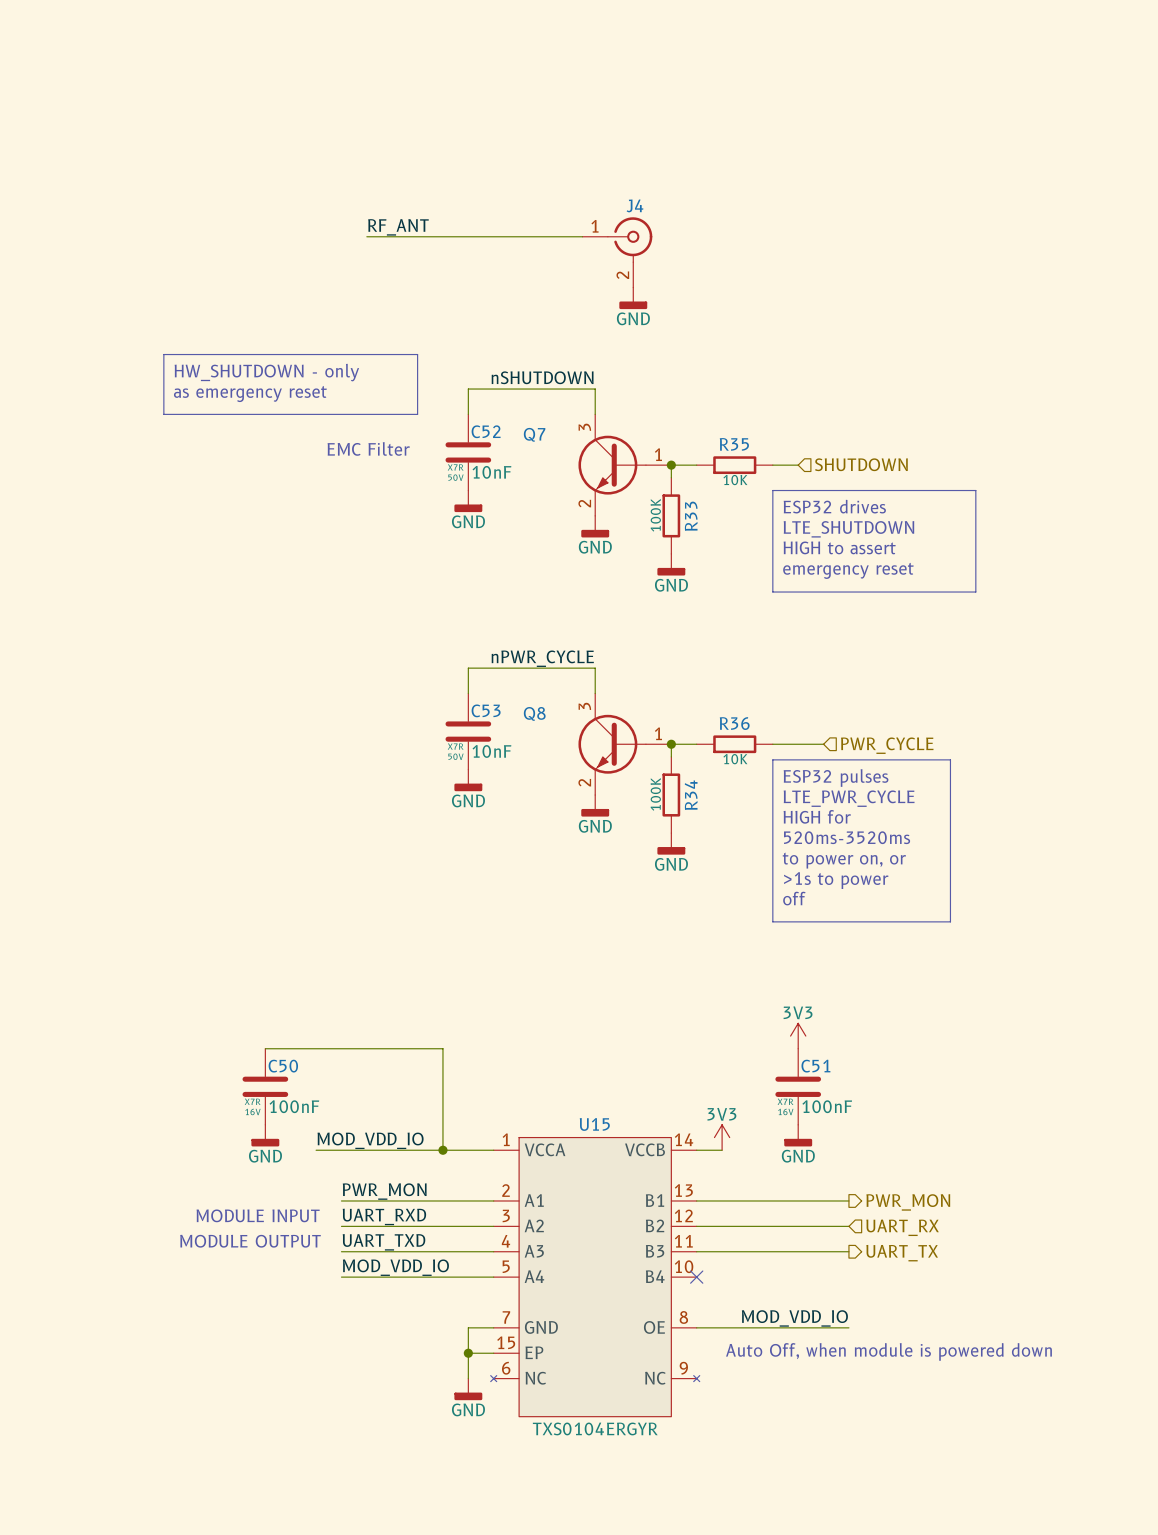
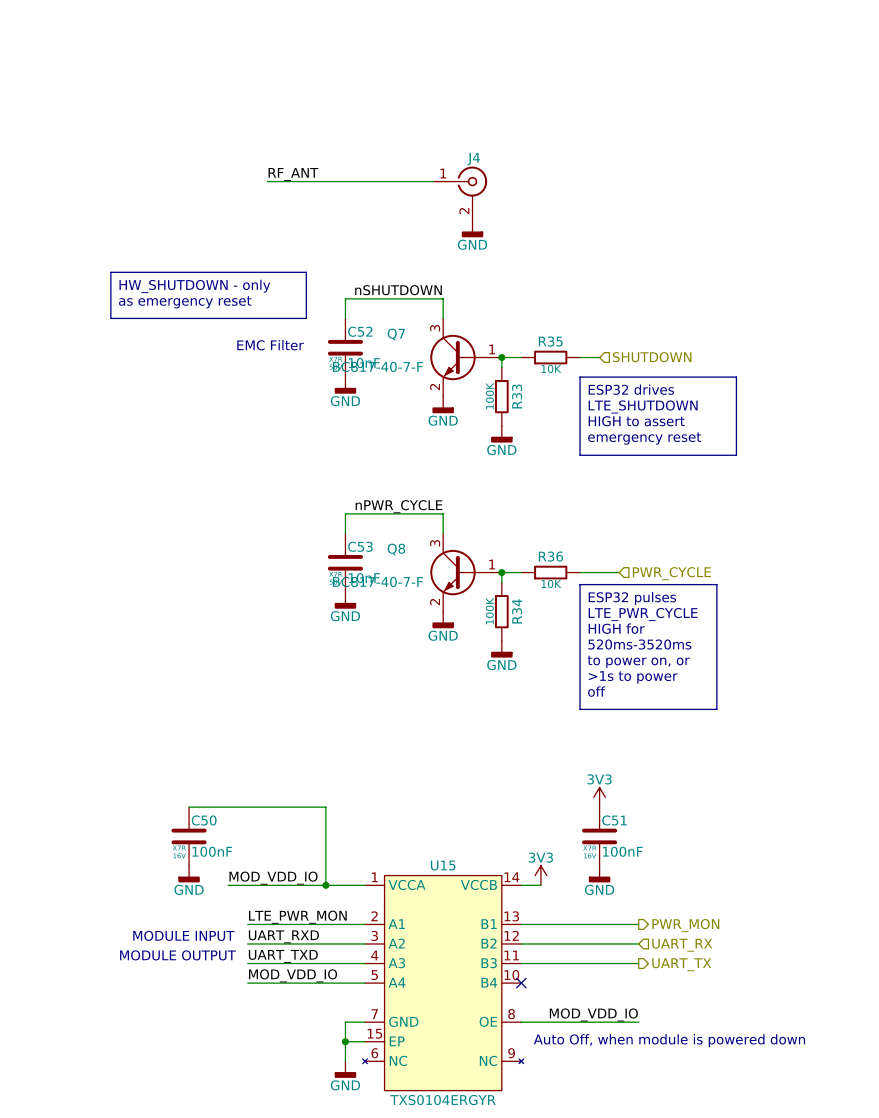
Q7 value: none -> BC817-40-7-F (377, 366)
Q8 value: none -> BC817-40-7-F (377, 581)
label: PWR_MON (384, 1191) -> LTE_PWR_MON (297, 917)

